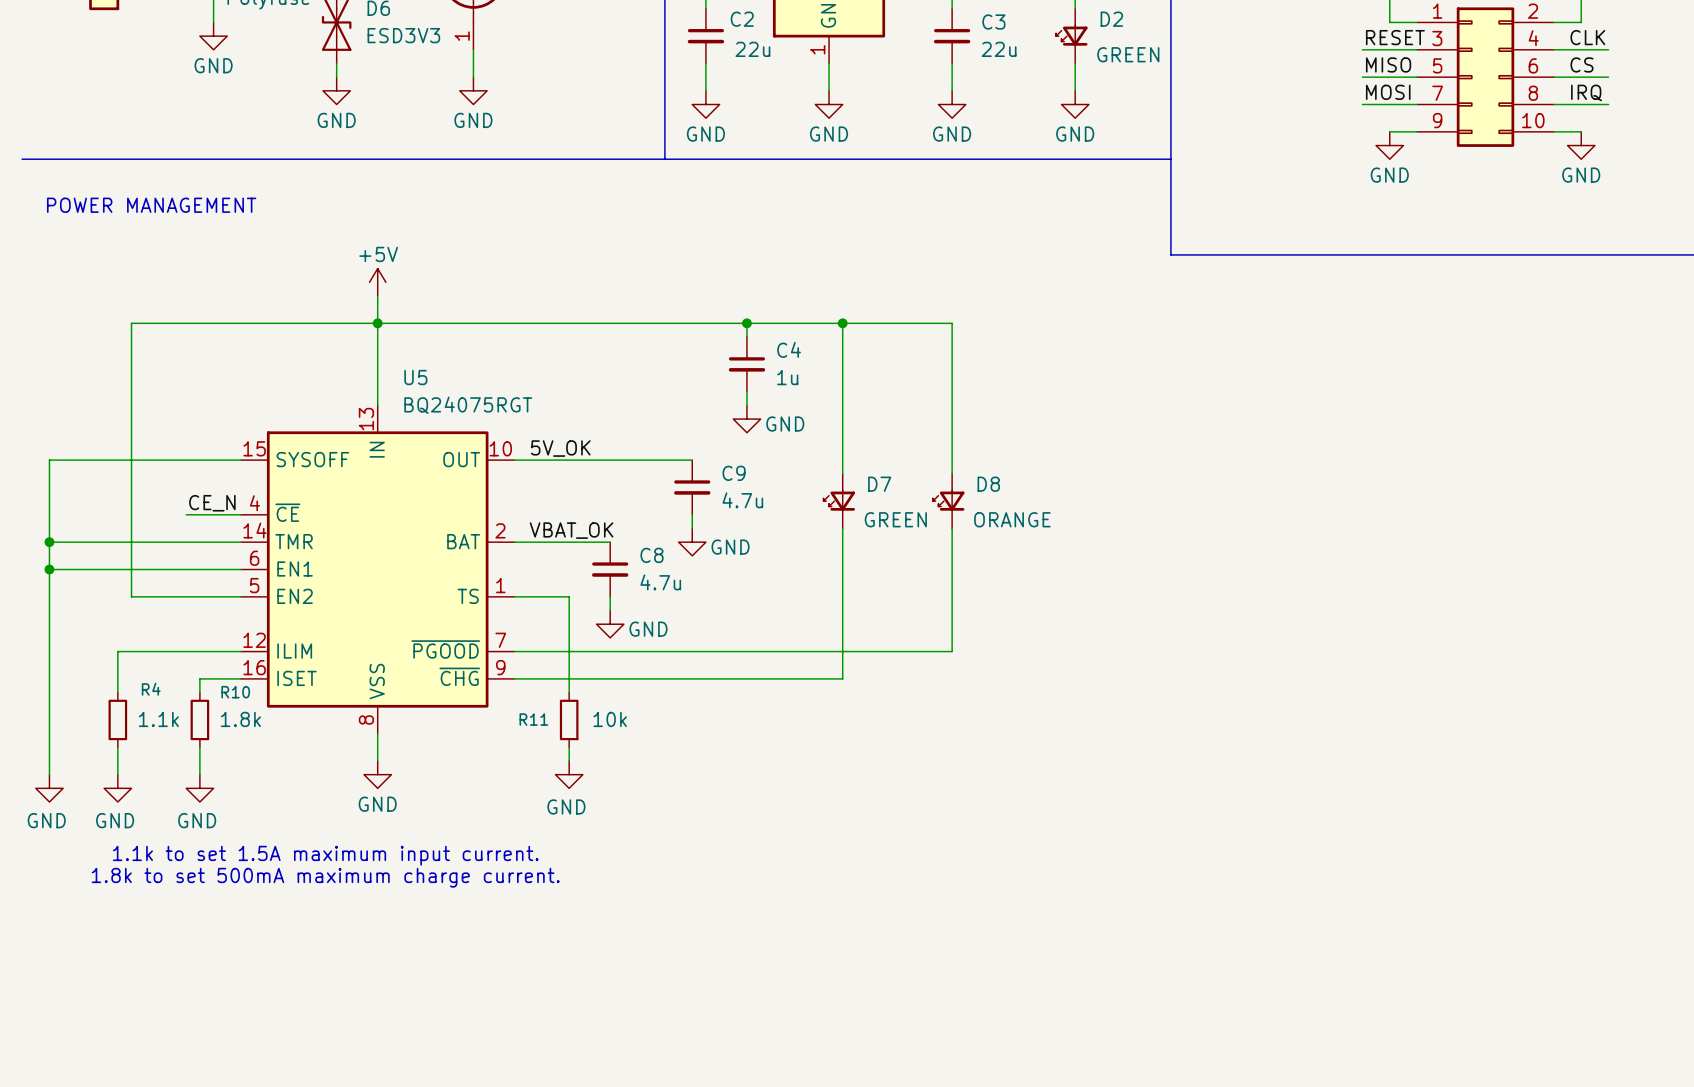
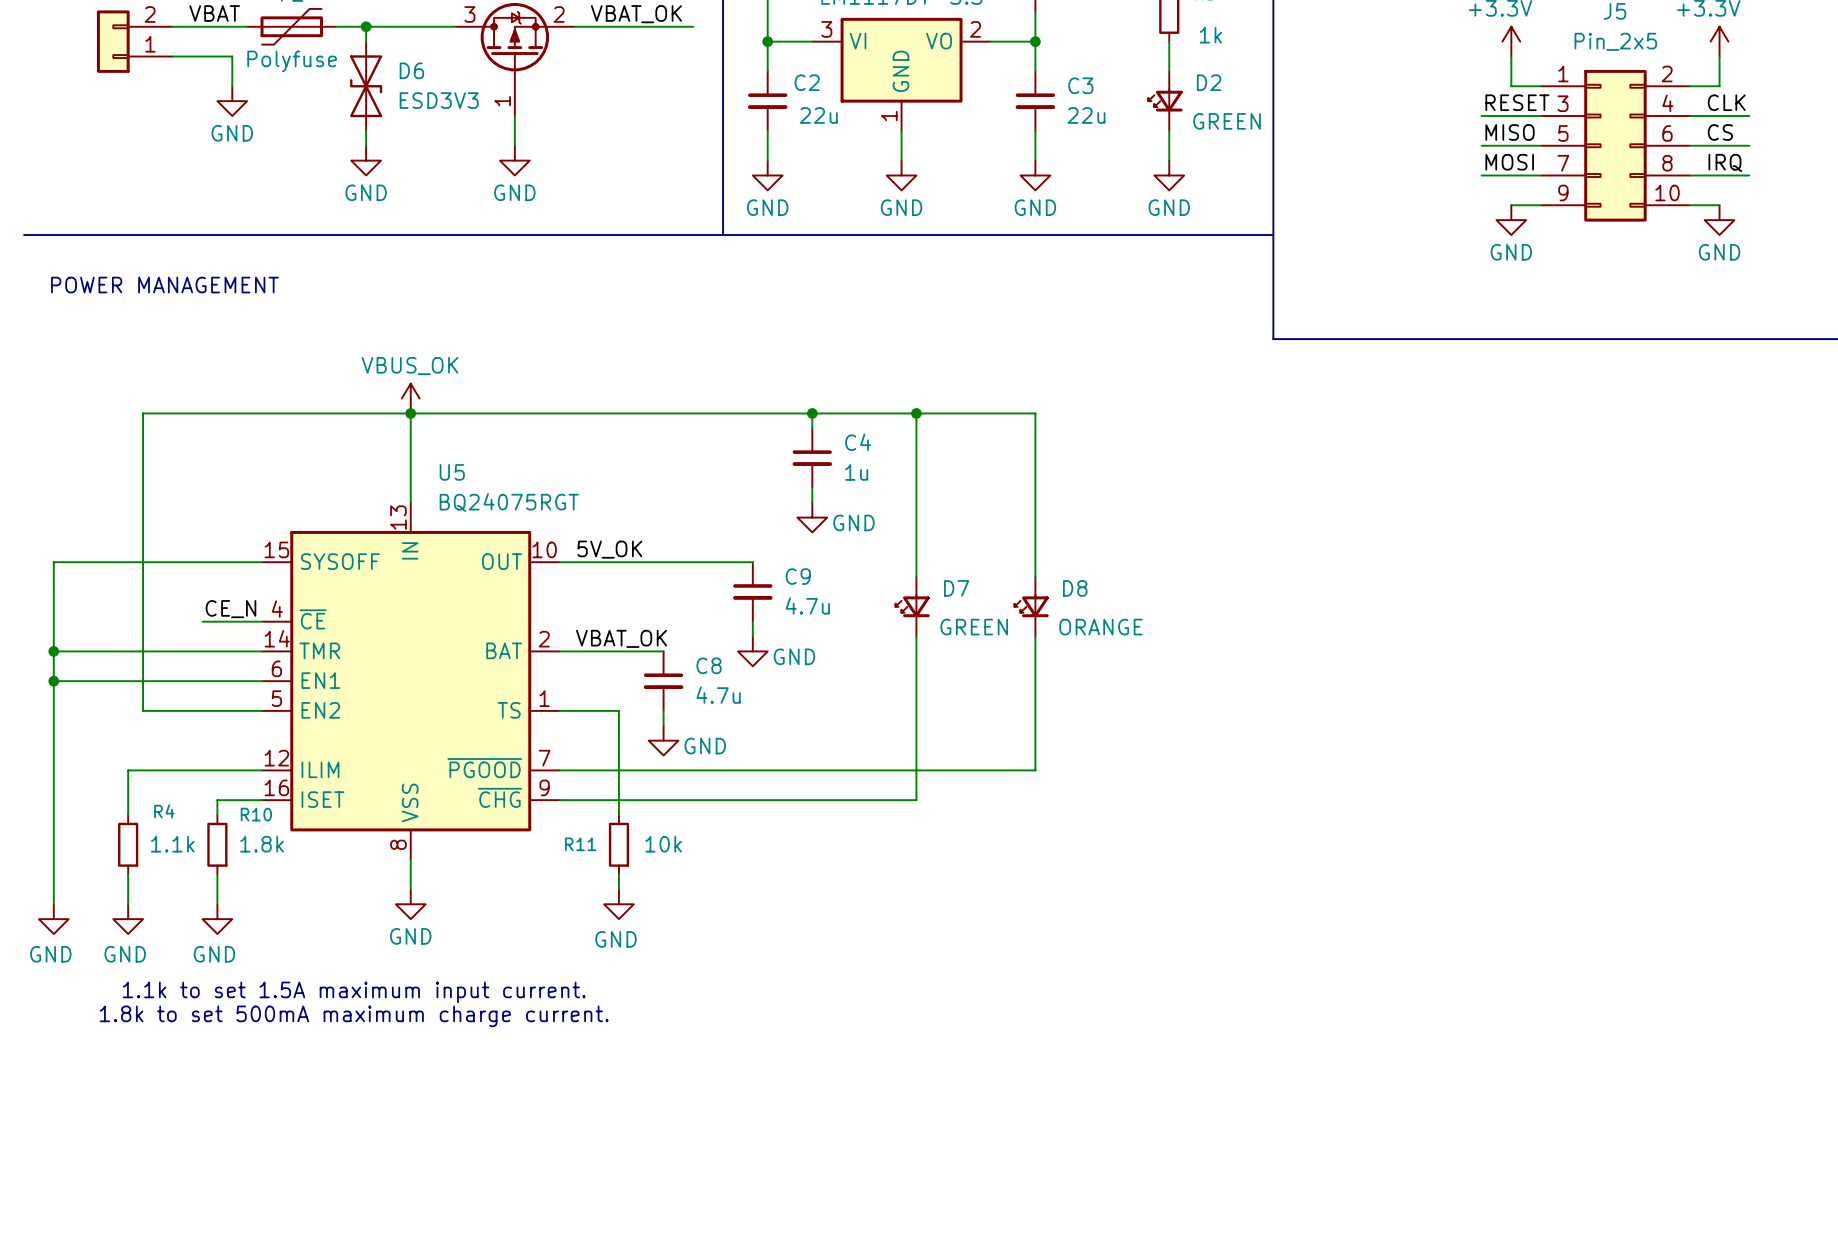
power symbol: +5V (377, 282) -> none
power symbol: none -> VBUS_OK (410, 398)

